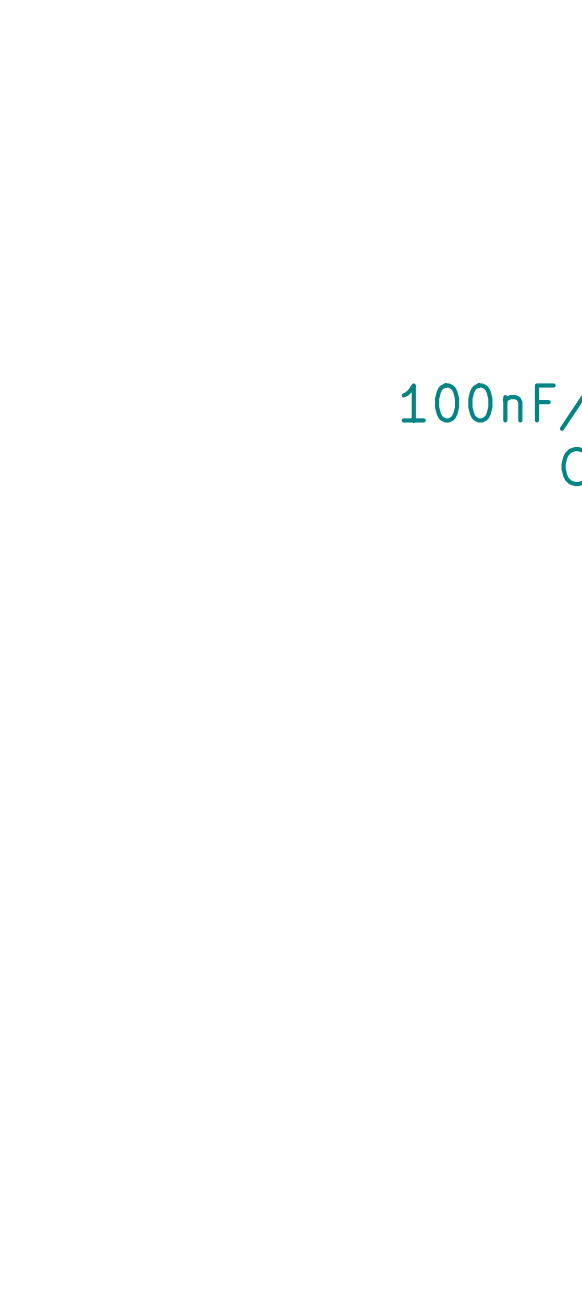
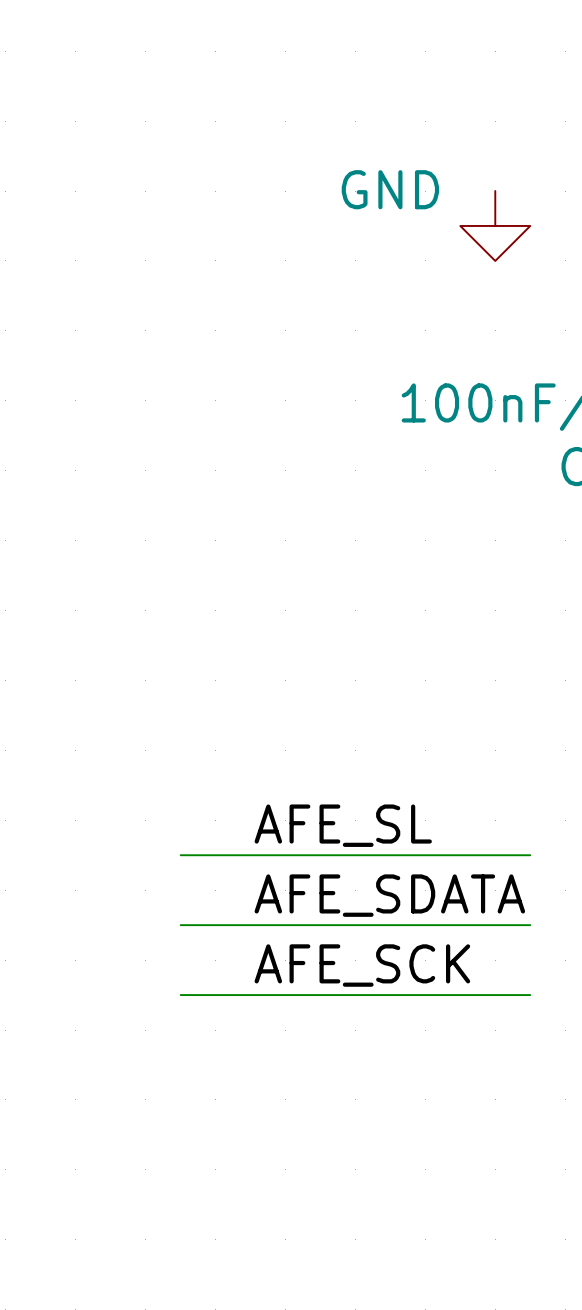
power symbol: none -> GND (495, 225)
label: none -> AFE_SL (343, 825)
wire: none -> (180, 855) (530, 855)
label: none -> AFE_SDATA (389, 895)
wire: none -> (180, 925) (530, 925)
label: none -> AFE_SCK (362, 965)
wire: none -> (180, 995) (530, 995)

